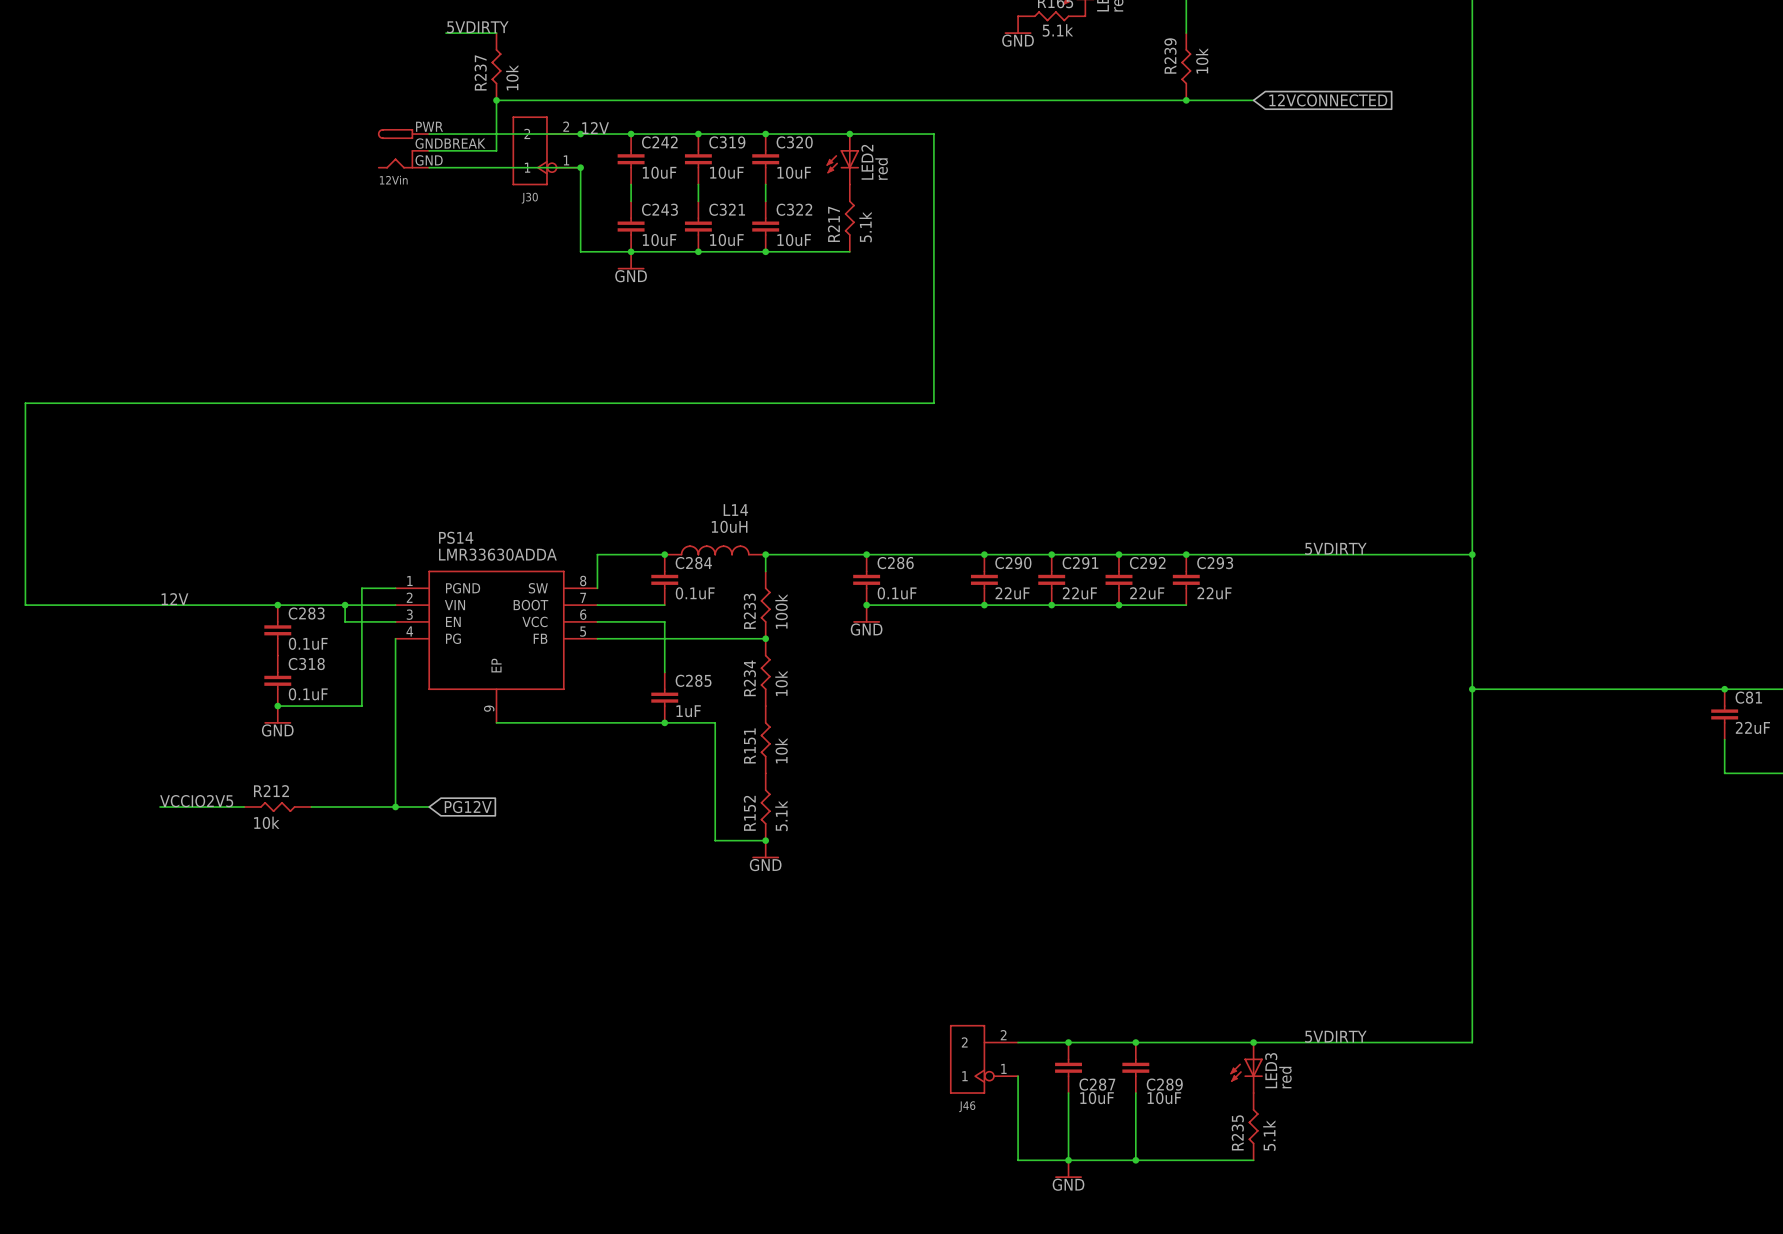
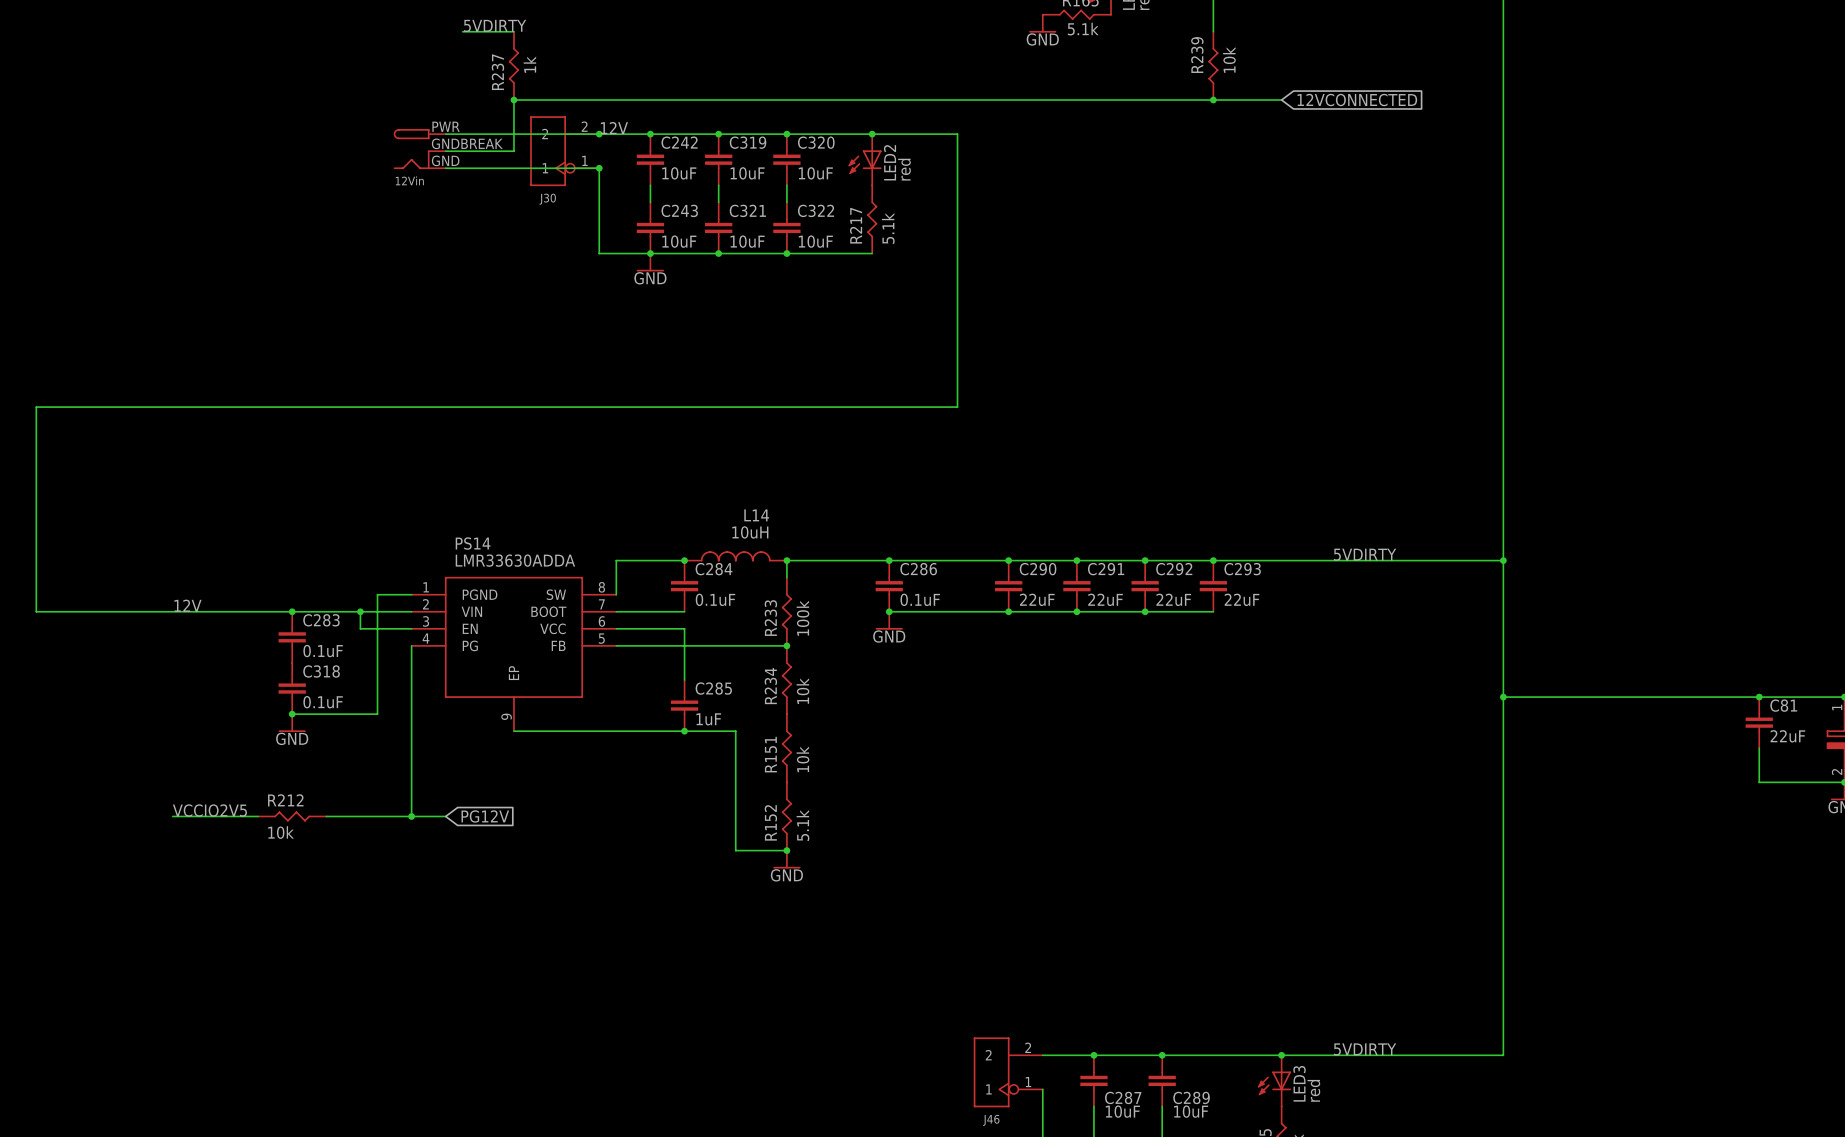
R237 value: 10k (512, 77) -> 1k (529, 64)

